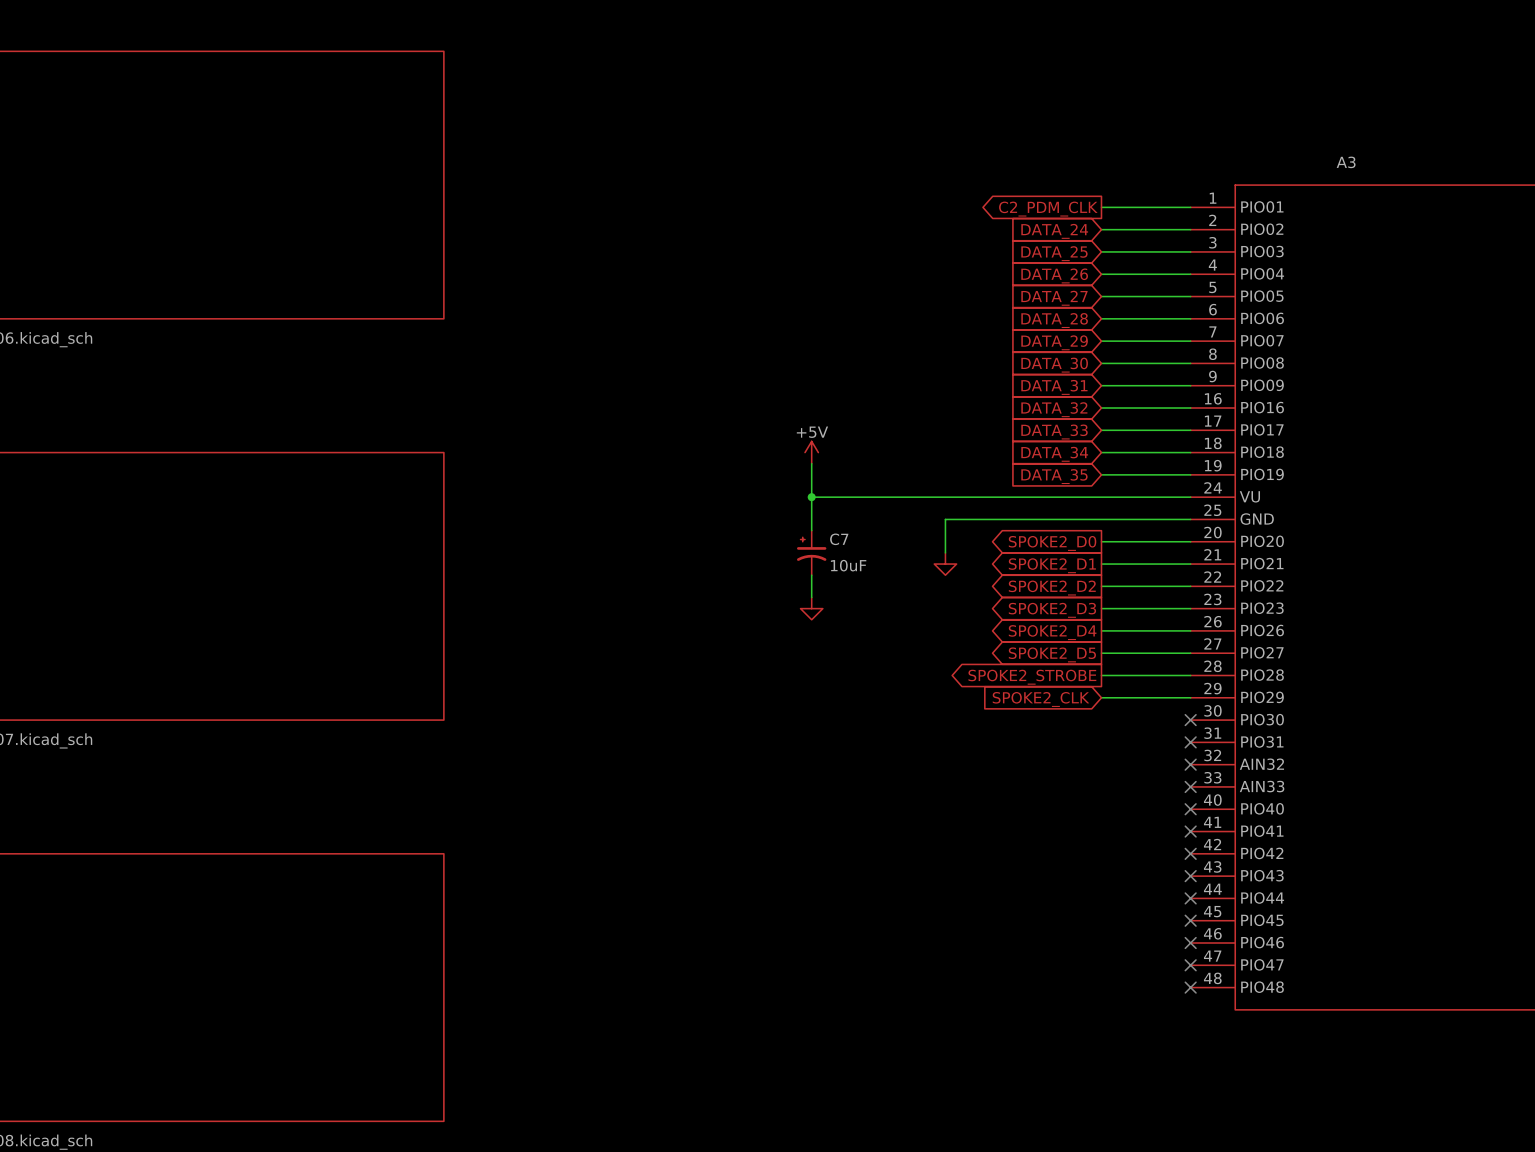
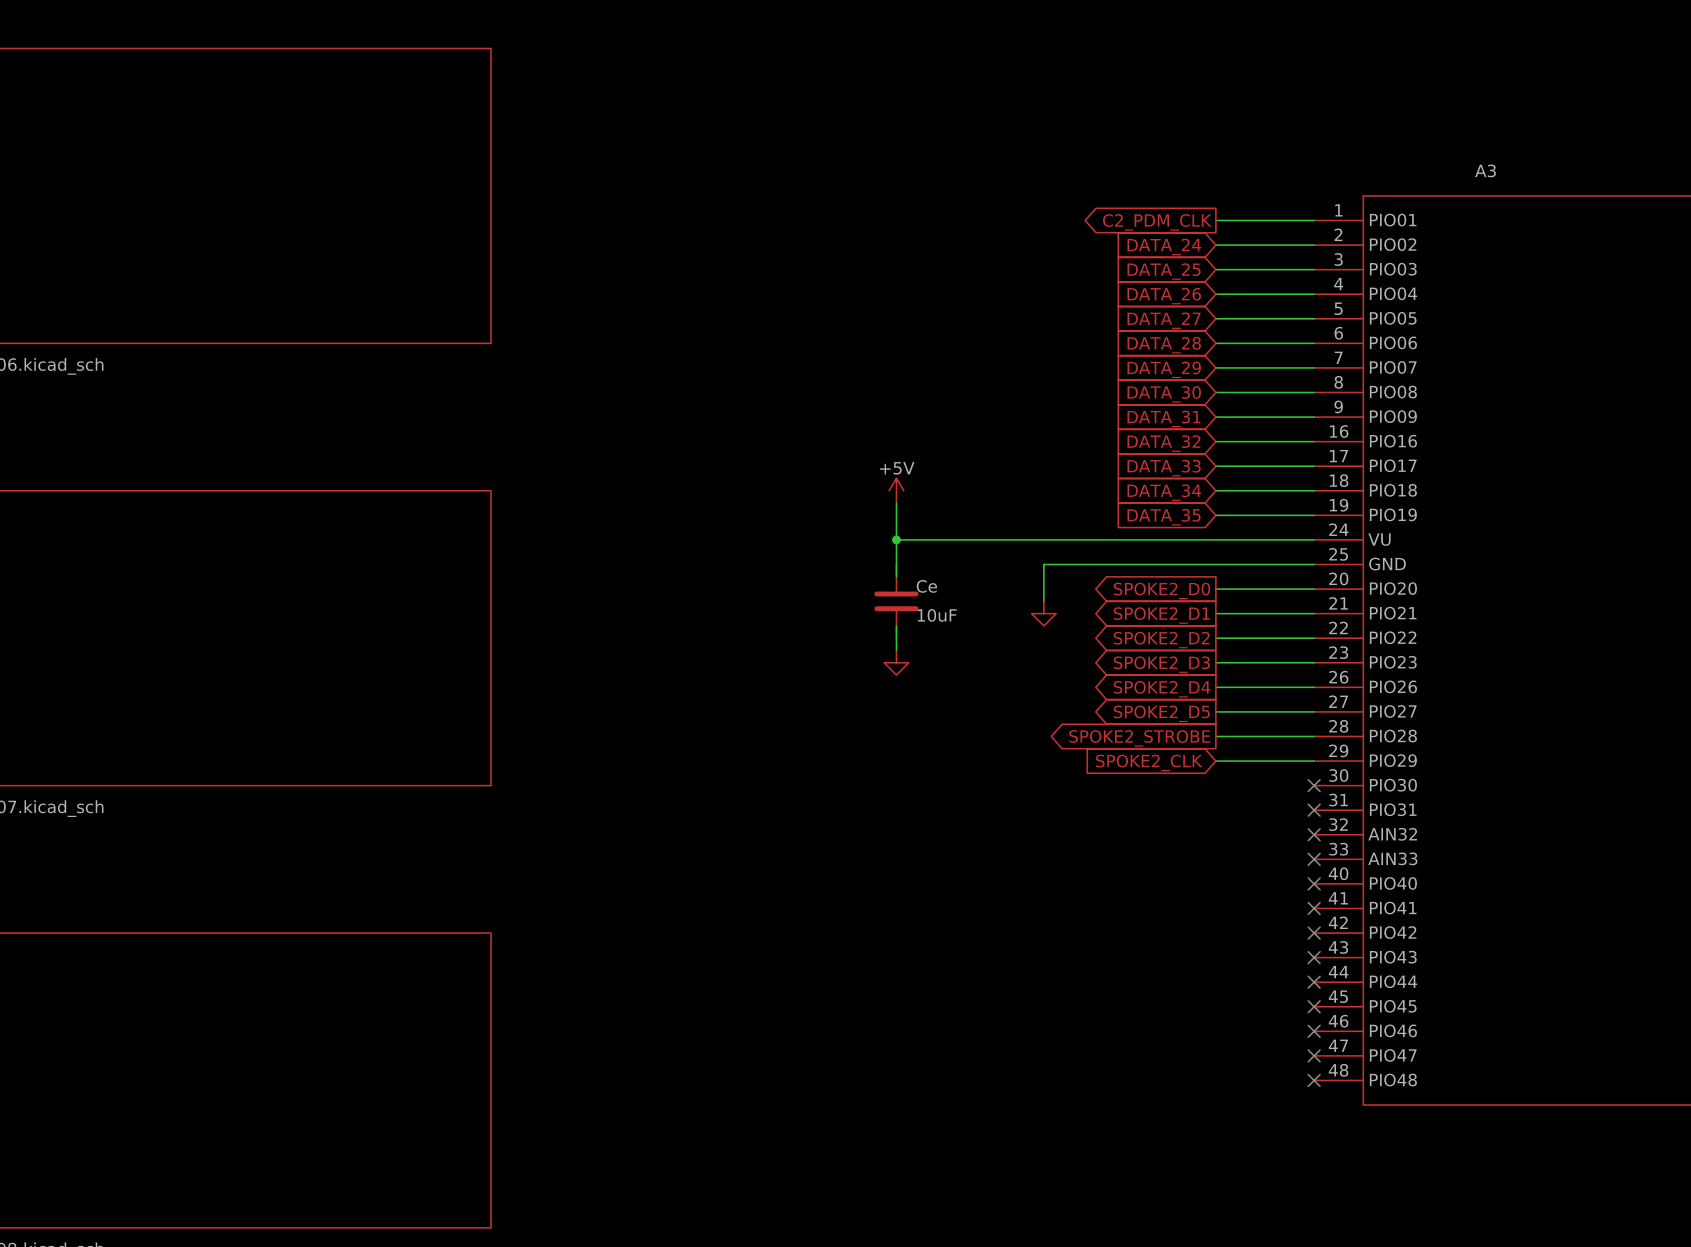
C7: 10uF (811, 552) -> none
Ce: none -> 10uF (896, 601)

